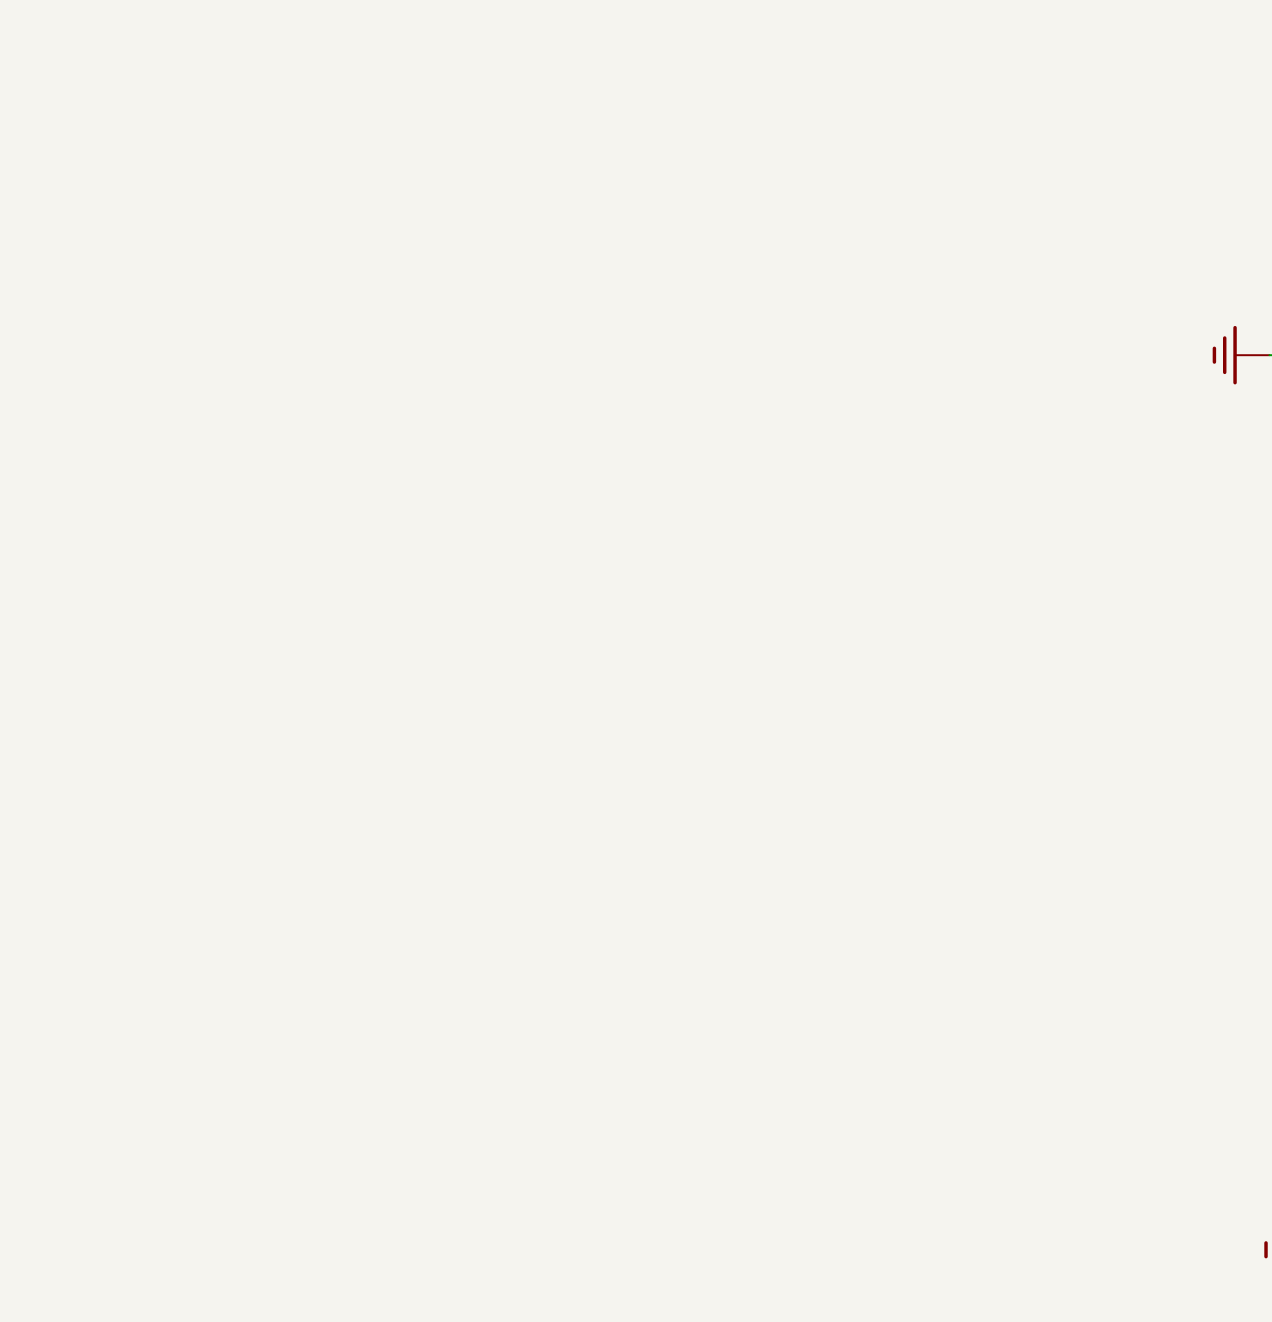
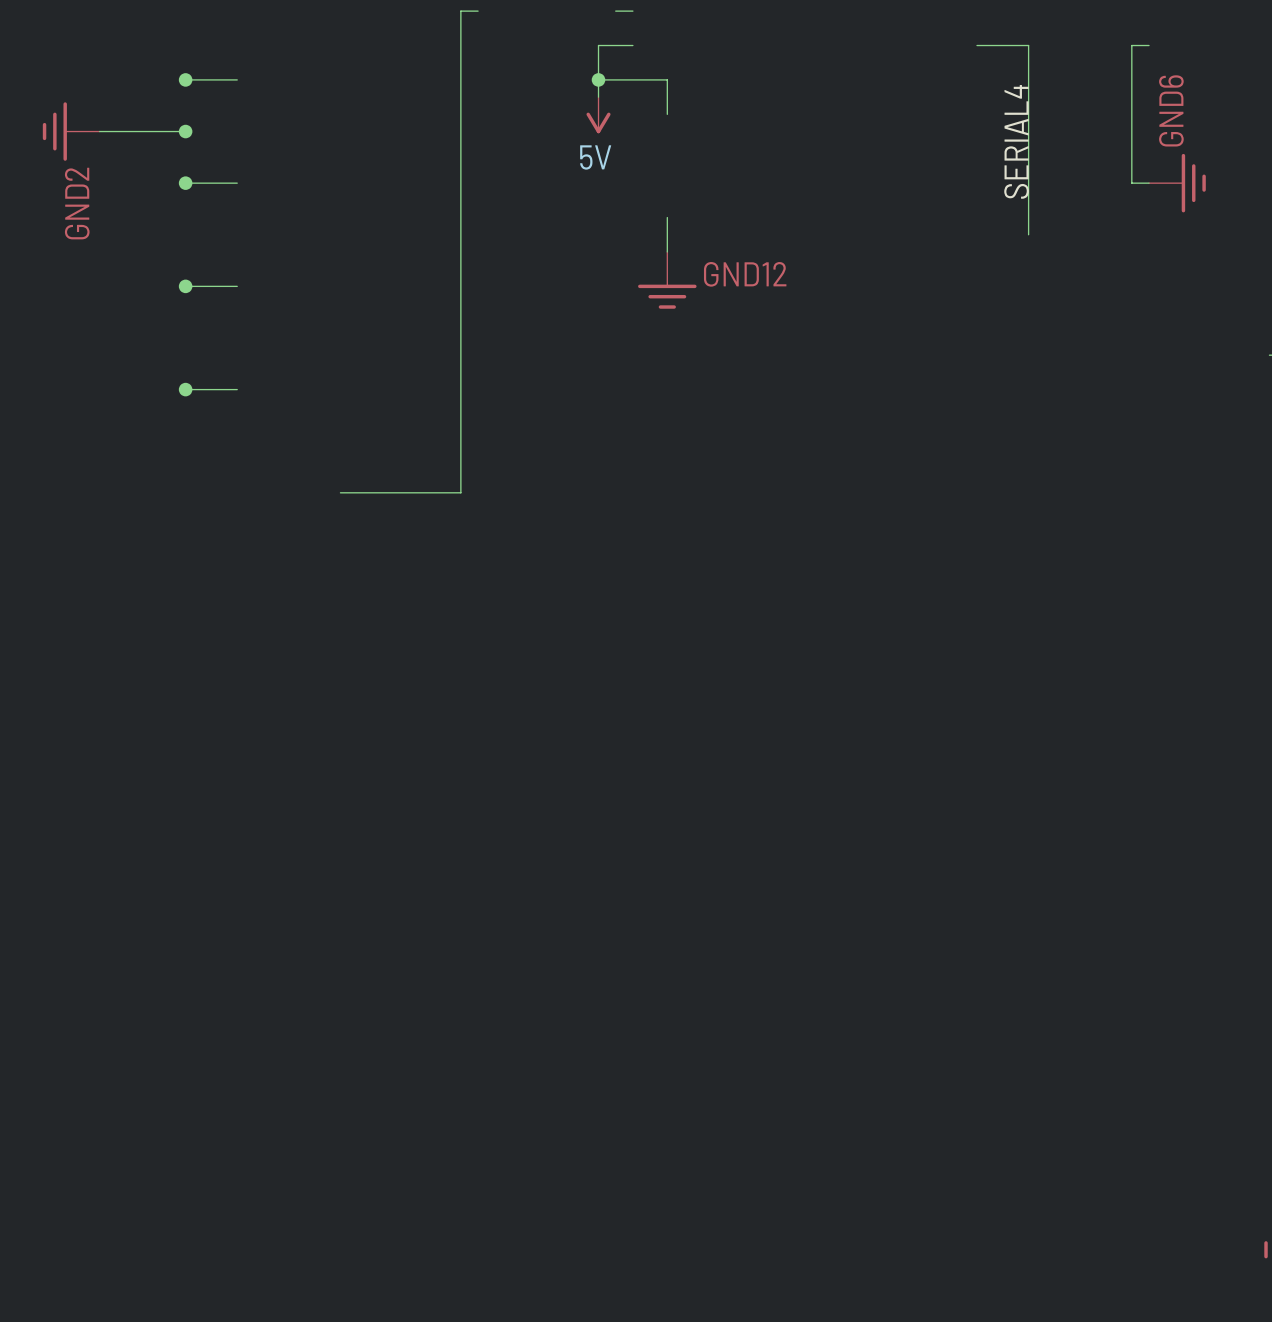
wire: none -> (478, 11) (460, 11) (460, 492) (340, 492)
wire: none -> (615, 11) (632, 11)
wire: none -> (632, 45) (598, 45) (598, 97)
wire: none -> (976, 45) (1028, 45) (1028, 234)
wire: none -> (1149, 45) (1131, 45) (1131, 183) (1149, 183)
wire: none -> (185, 79) (237, 79)
junction: none -> (185, 79)
wire: none -> (598, 79) (667, 79) (667, 114)
junction: none -> (598, 79)
power symbol: none -> 5V (598, 115)
GND2: none -> (71, 131)
wire: none -> (99, 131) (185, 131)
junction: none -> (185, 131)
label: none -> SERIAL4 (1016, 141)
wire: none -> (185, 183) (237, 183)
junction: none -> (185, 183)
GND6: none -> (1177, 183)
wire: none -> (667, 217) (667, 251)
GND12: none -> (667, 280)
wire: none -> (185, 286) (237, 286)
junction: none -> (185, 286)
power symbol: (1241, 355) -> none
wire: none -> (185, 389) (237, 389)
junction: none -> (185, 389)

